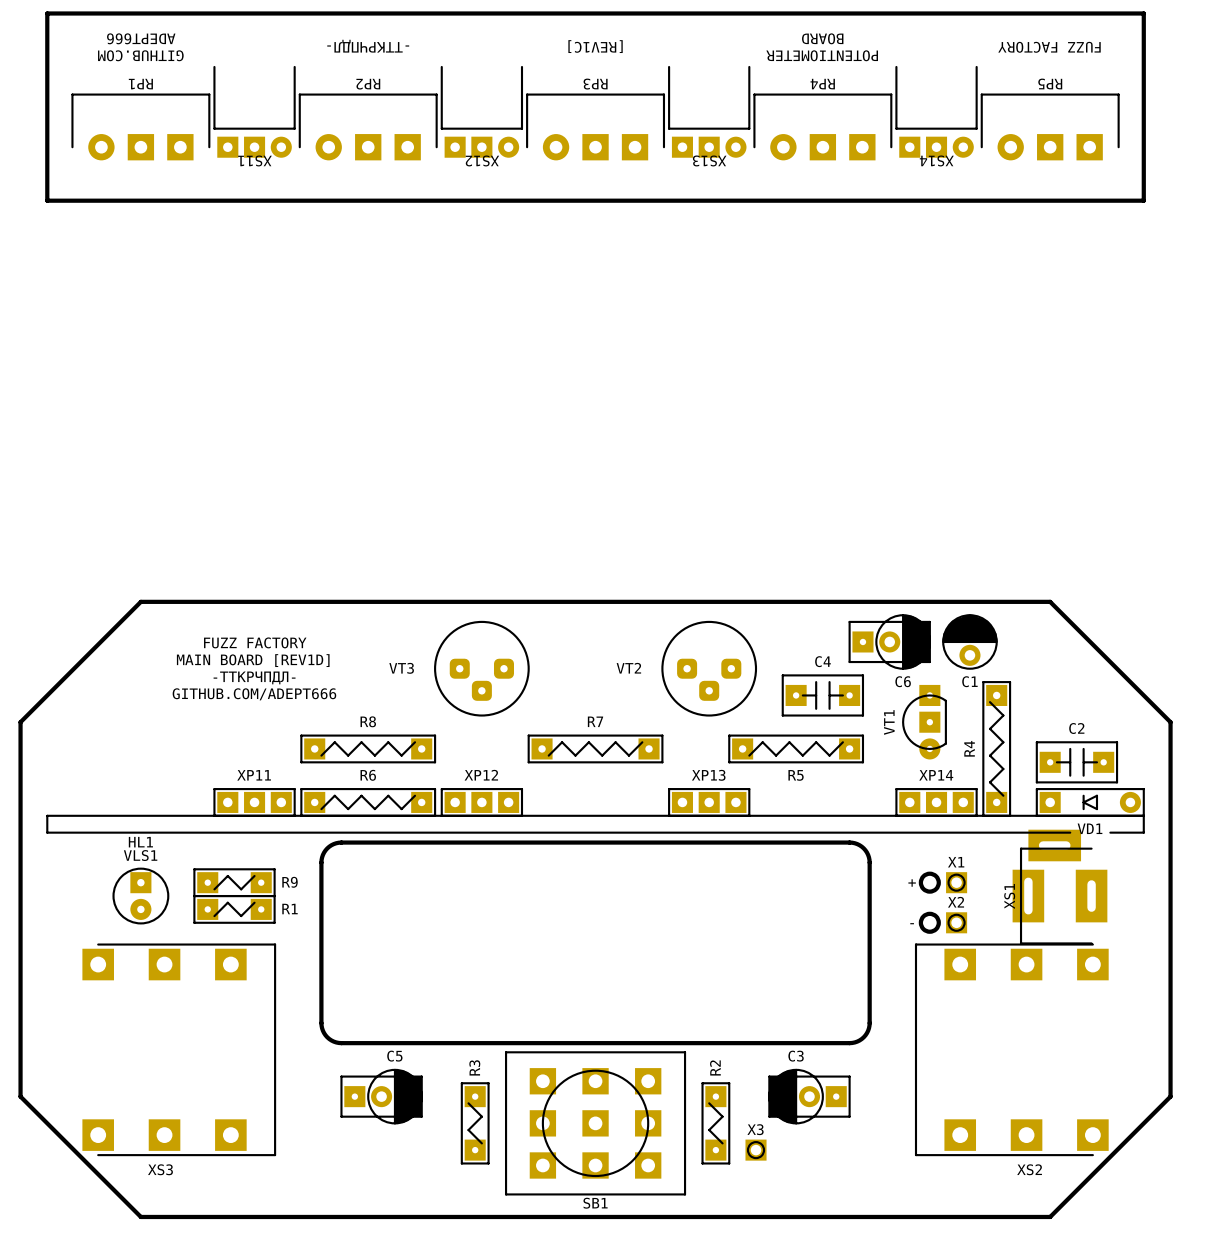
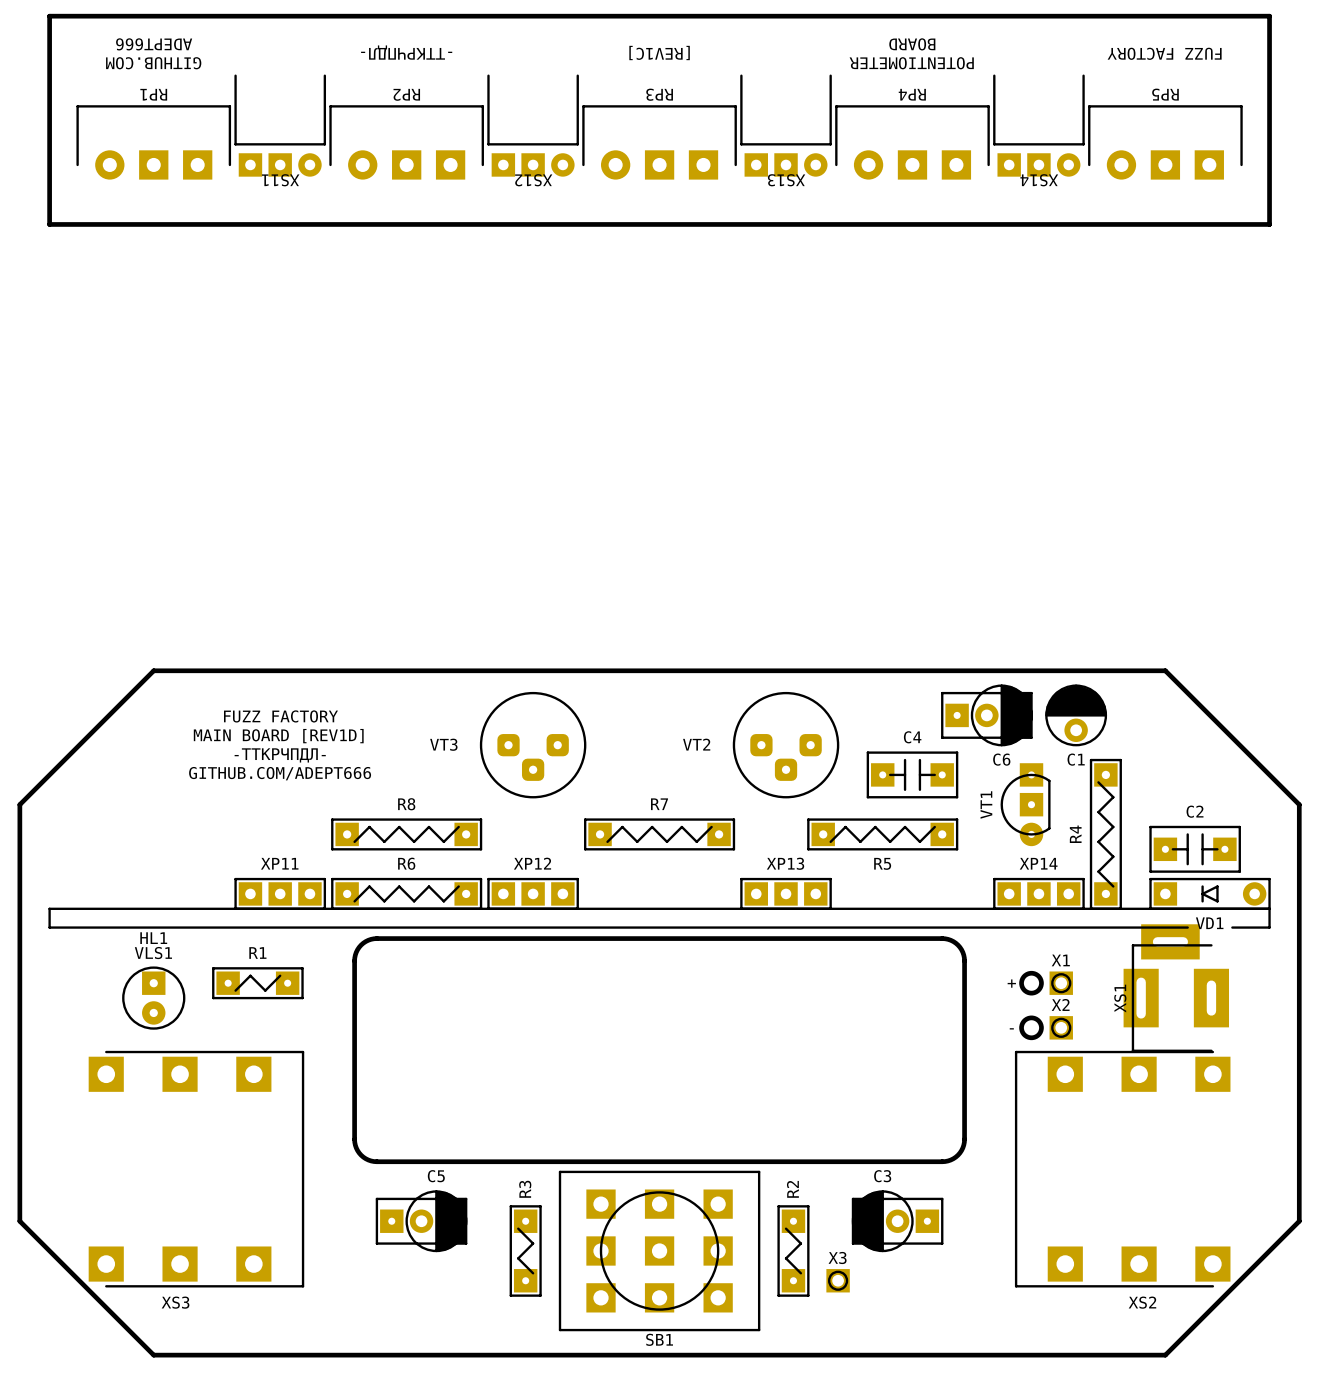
R9 name: R9 (290, 882) -> R1 (257, 953)
R1: (234, 909) -> none

